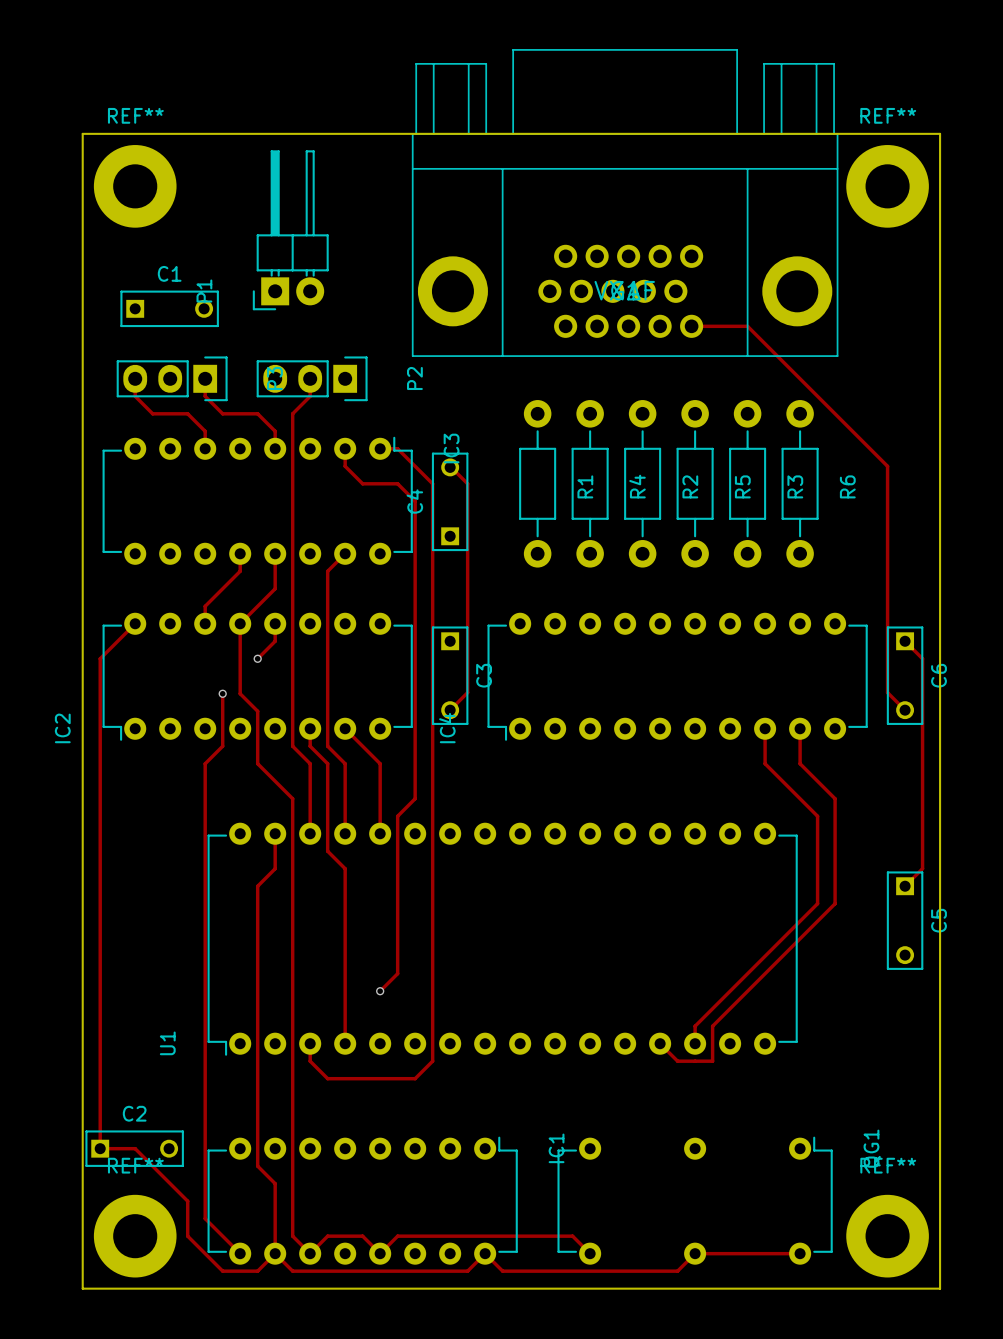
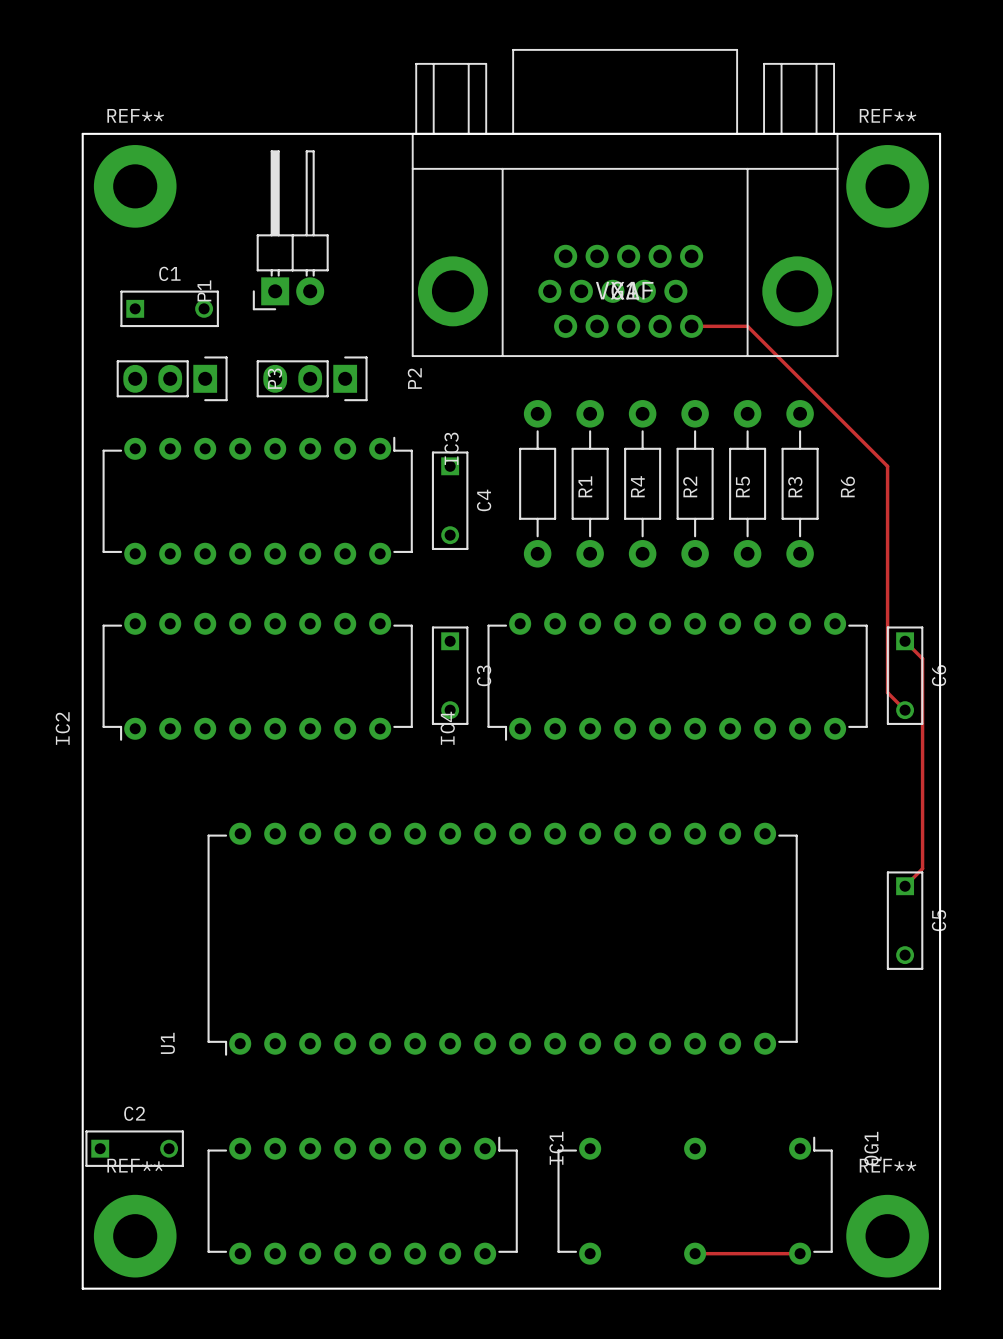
track: (135, 378) (135, 396) (152, 413) (187, 413) (205, 431) (205, 448) -> none
track: (205, 378) (205, 396) (222, 413) (257, 413) (275, 431) (275, 448) -> none
track: (310, 378) (310, 396) (292, 413) (292, 746) (310, 763) (310, 833) -> none
track: (345, 448) (345, 466) (362, 483) (397, 483) (415, 501) (415, 798) (397, 816) (397, 973) (380, 991) -> none
track: (380, 448) (397, 448) (432, 483) (432, 1061) (415, 1078) (327, 1078) (310, 1061) (310, 1043) -> none
track: (450, 467) (467, 483) (467, 692) (450, 710) -> none
C4 rotation: 0° (450, 501) -> 180° (450, 500)
track: (240, 553) (240, 571) (205, 606) (205, 623) -> none
track: (275, 553) (275, 588) (240, 623) (240, 693) (257, 711) (257, 763) (292, 798) (292, 1236) (310, 1253) (327, 1236) (362, 1236) (380, 1253) (397, 1236) (572, 1236) (590, 1253) -> none
track: (345, 553) (327, 571) (327, 746) (345, 763) (345, 833) -> none
track: (135, 623) (100, 658) (100, 1148) (135, 1148) (187, 1201) (187, 1236) (222, 1271) (257, 1271) (275, 1253) -> none
track: (275, 623) (275, 641) (257, 658) -> none
via: (257, 658) -> none
track: (222, 693) (222, 746) (205, 763) (205, 1218) (240, 1253) -> none
via: (222, 693) -> none
track: (310, 728) (310, 746) (327, 763) (327, 851) (345, 868) (345, 1043) -> none
track: (345, 728) (380, 763) (380, 833) -> none
track: (765, 728) (765, 763) (817, 816) (817, 903) (695, 1026) (695, 1043) -> none
track: (800, 728) (800, 763) (835, 798) (835, 903) (712, 1026) (712, 1061) (677, 1061) (660, 1043) -> none
track: (275, 833) (275, 868) (257, 886) (257, 1166) (275, 1183) (275, 1253) -> none
via: (380, 991) -> none
track: (275, 1253) (292, 1271) (467, 1271) (485, 1253) (502, 1271) (677, 1271) (695, 1253) -> none

